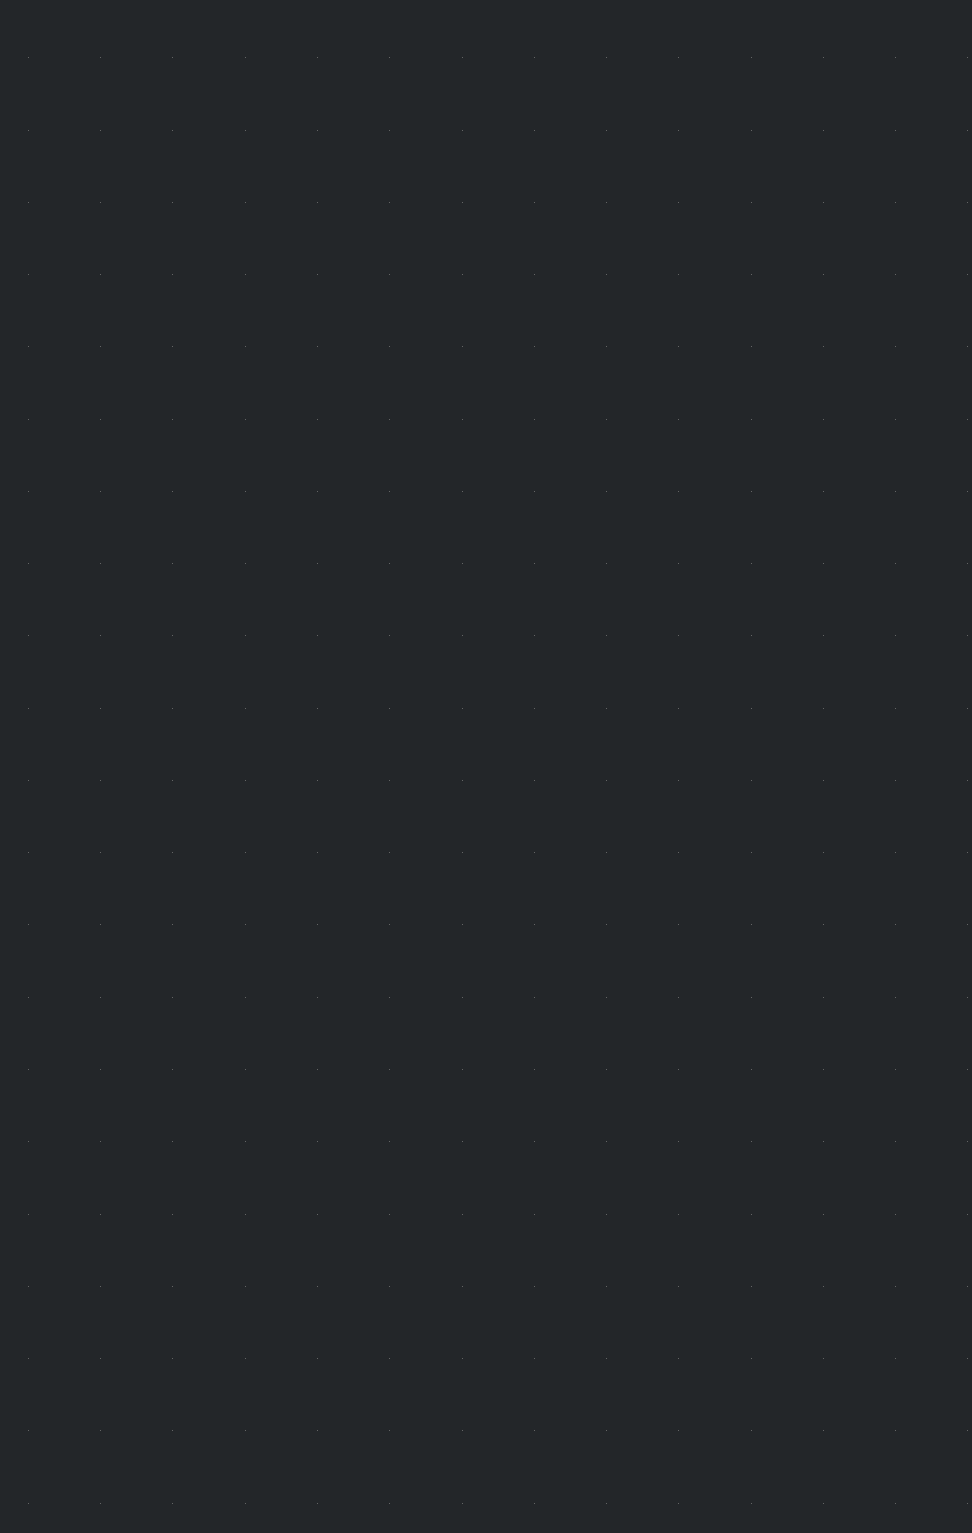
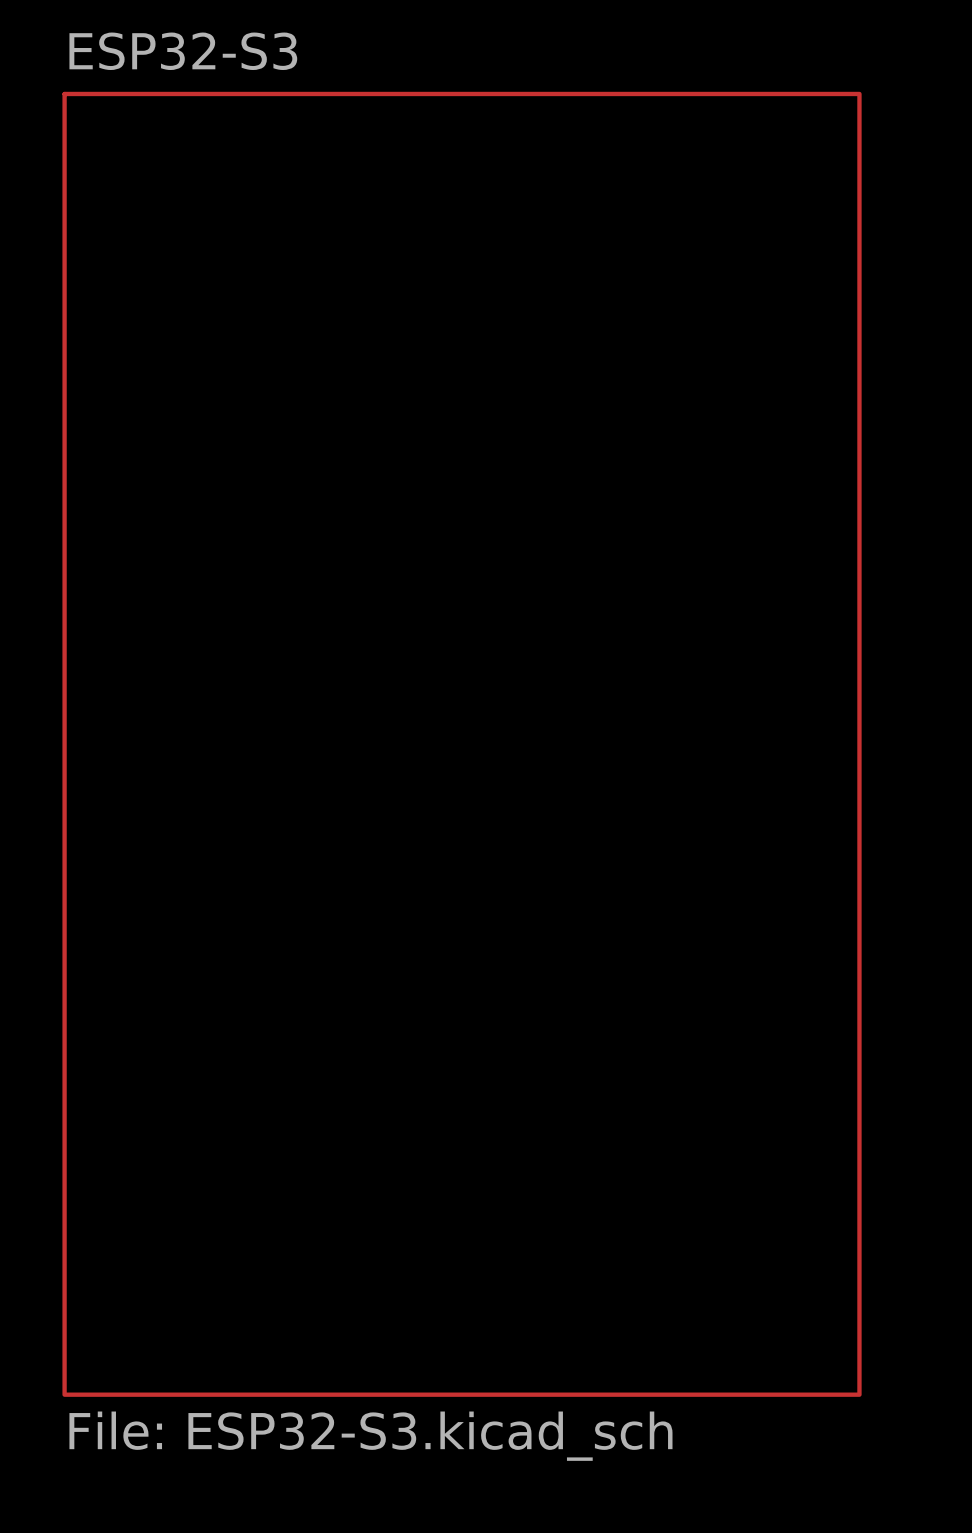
sheet ESP32-S3: none -> File: ESP32-S3.kicad_sch (462, 744)

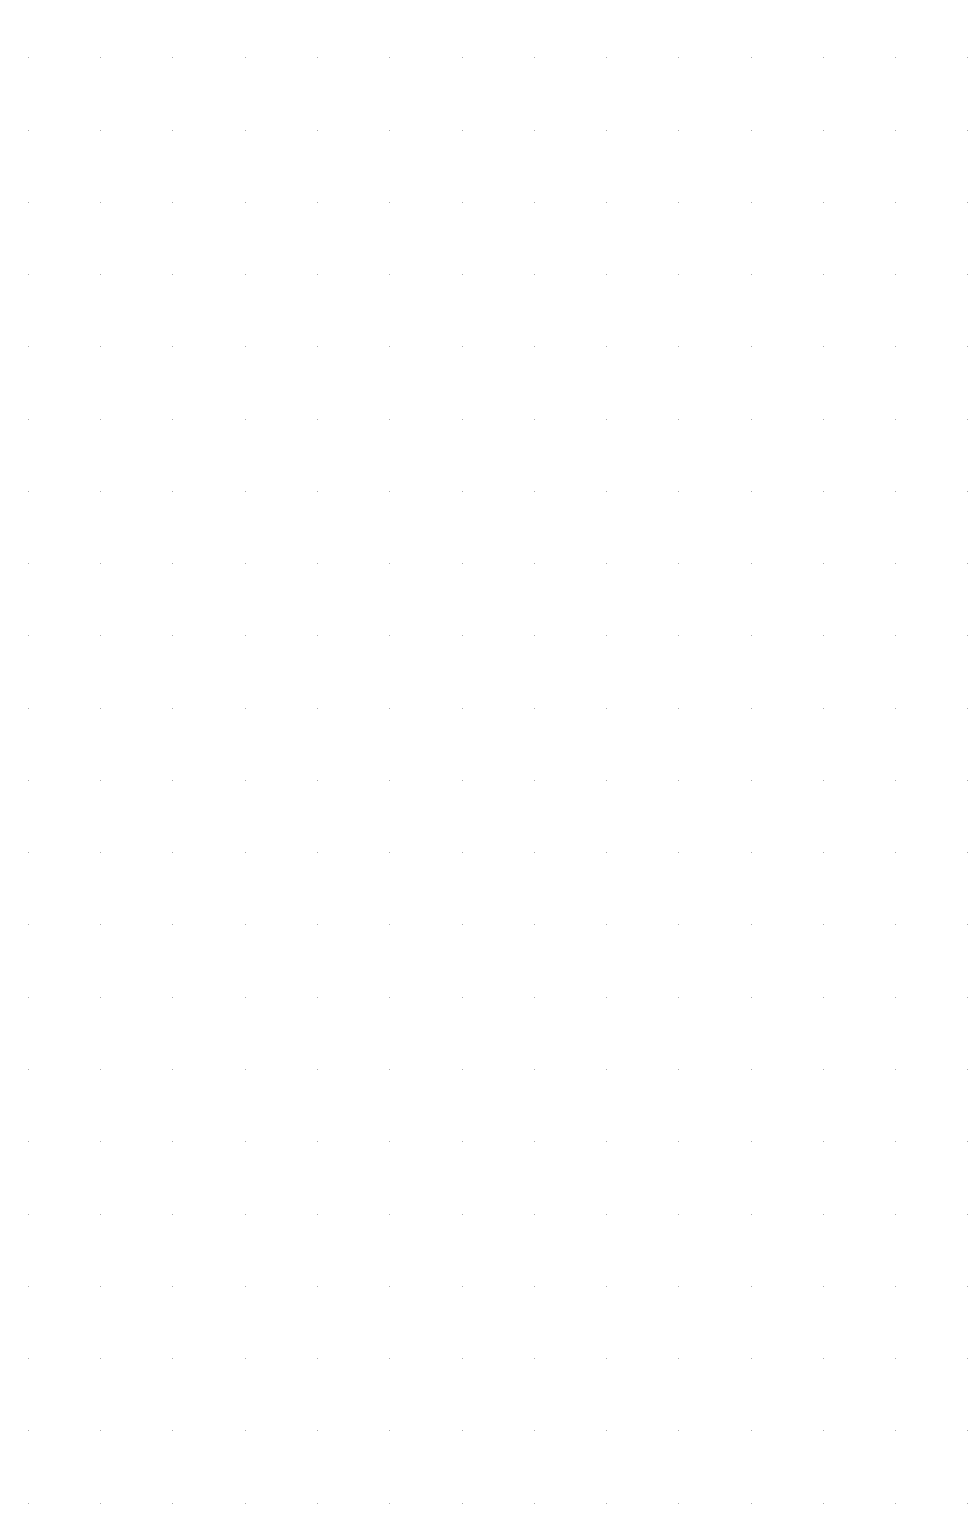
sheet ESP32-S3: File: ESP32-S3.kicad_sch (462, 744) -> none

